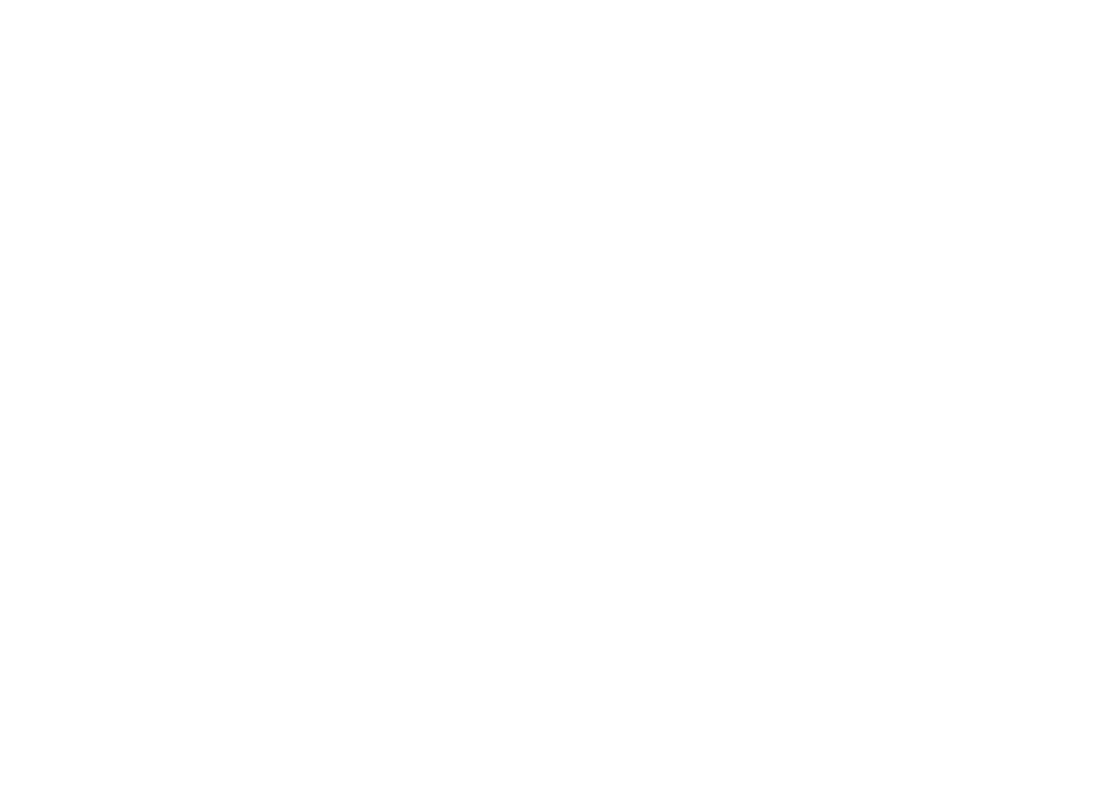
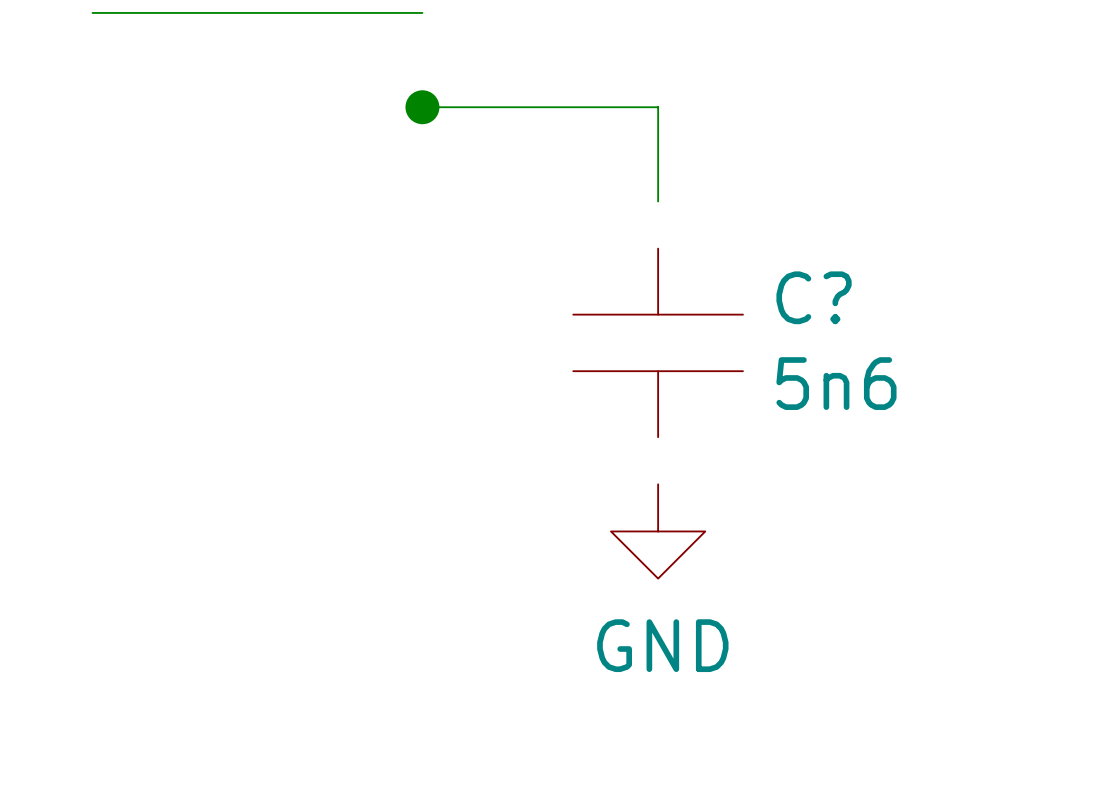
wire: none -> (92, 12) (422, 12)
wire: none -> (422, 107) (658, 107) (658, 201)
junction: none -> (422, 107)
C?: none -> 5n6 (658, 342)
power symbol: none -> GND (658, 531)

